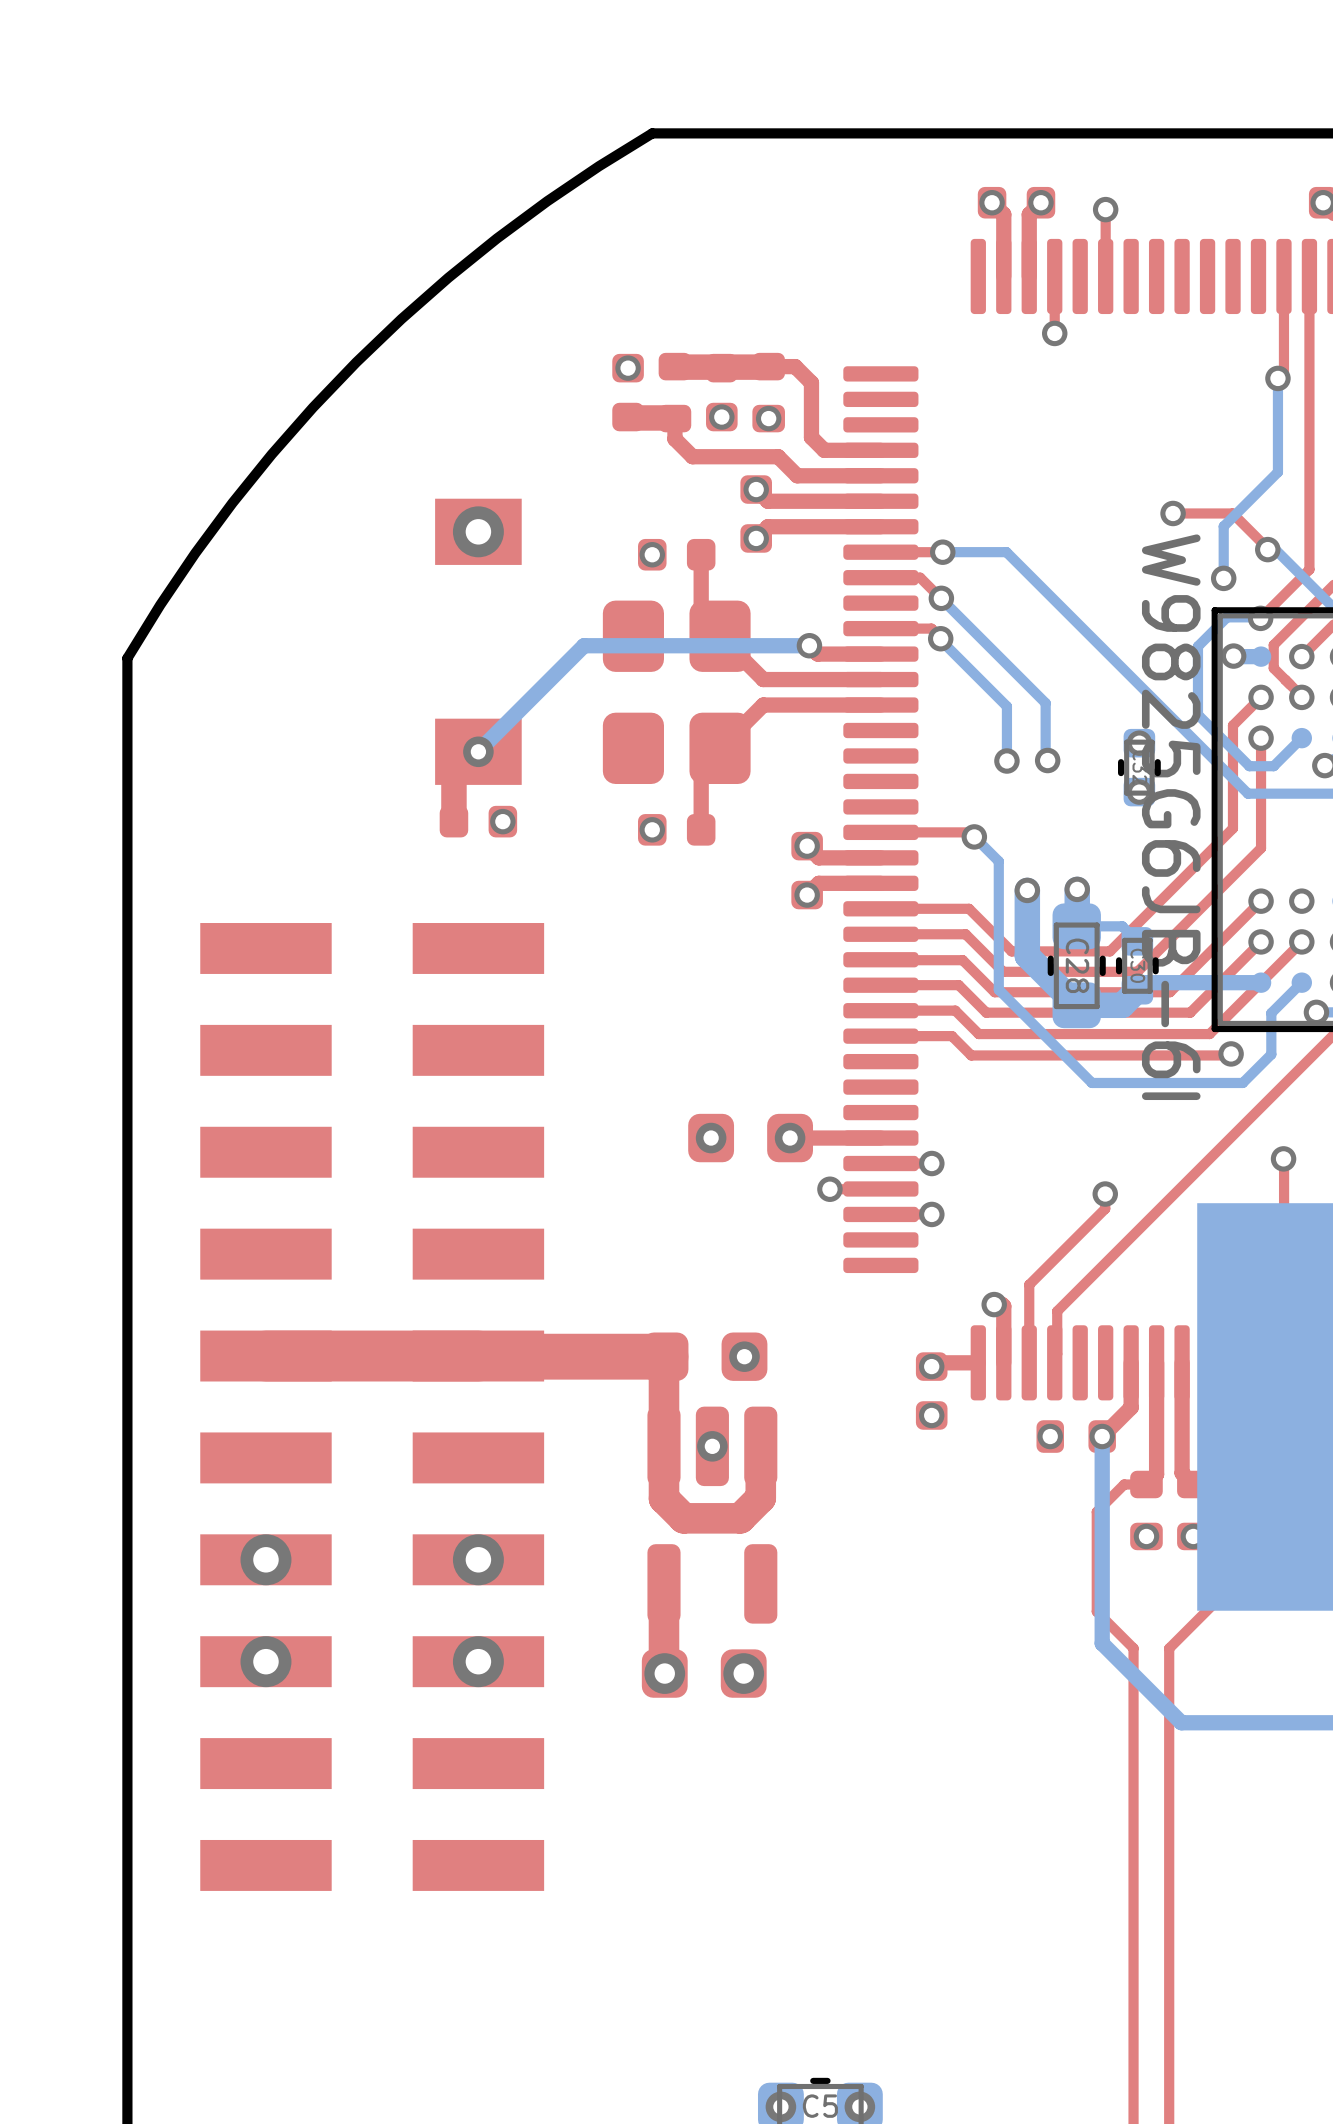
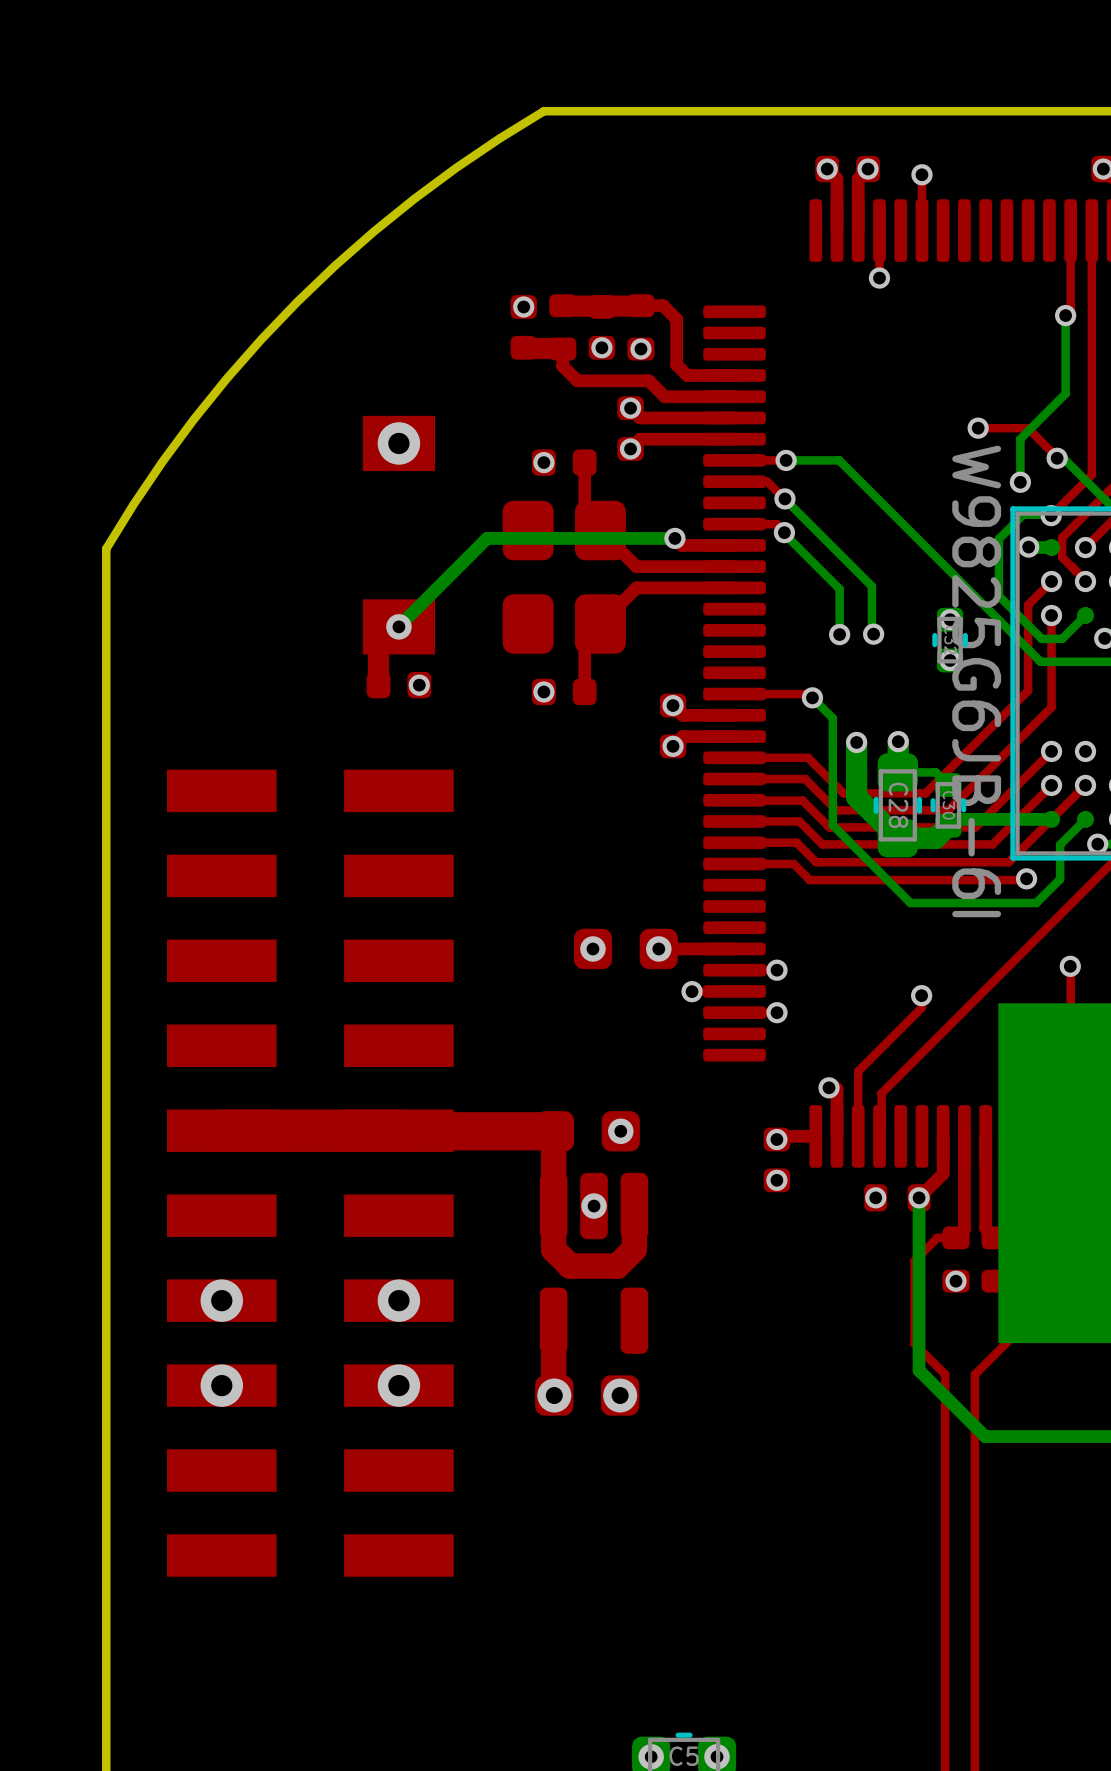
via: (1193, 1536) -> none

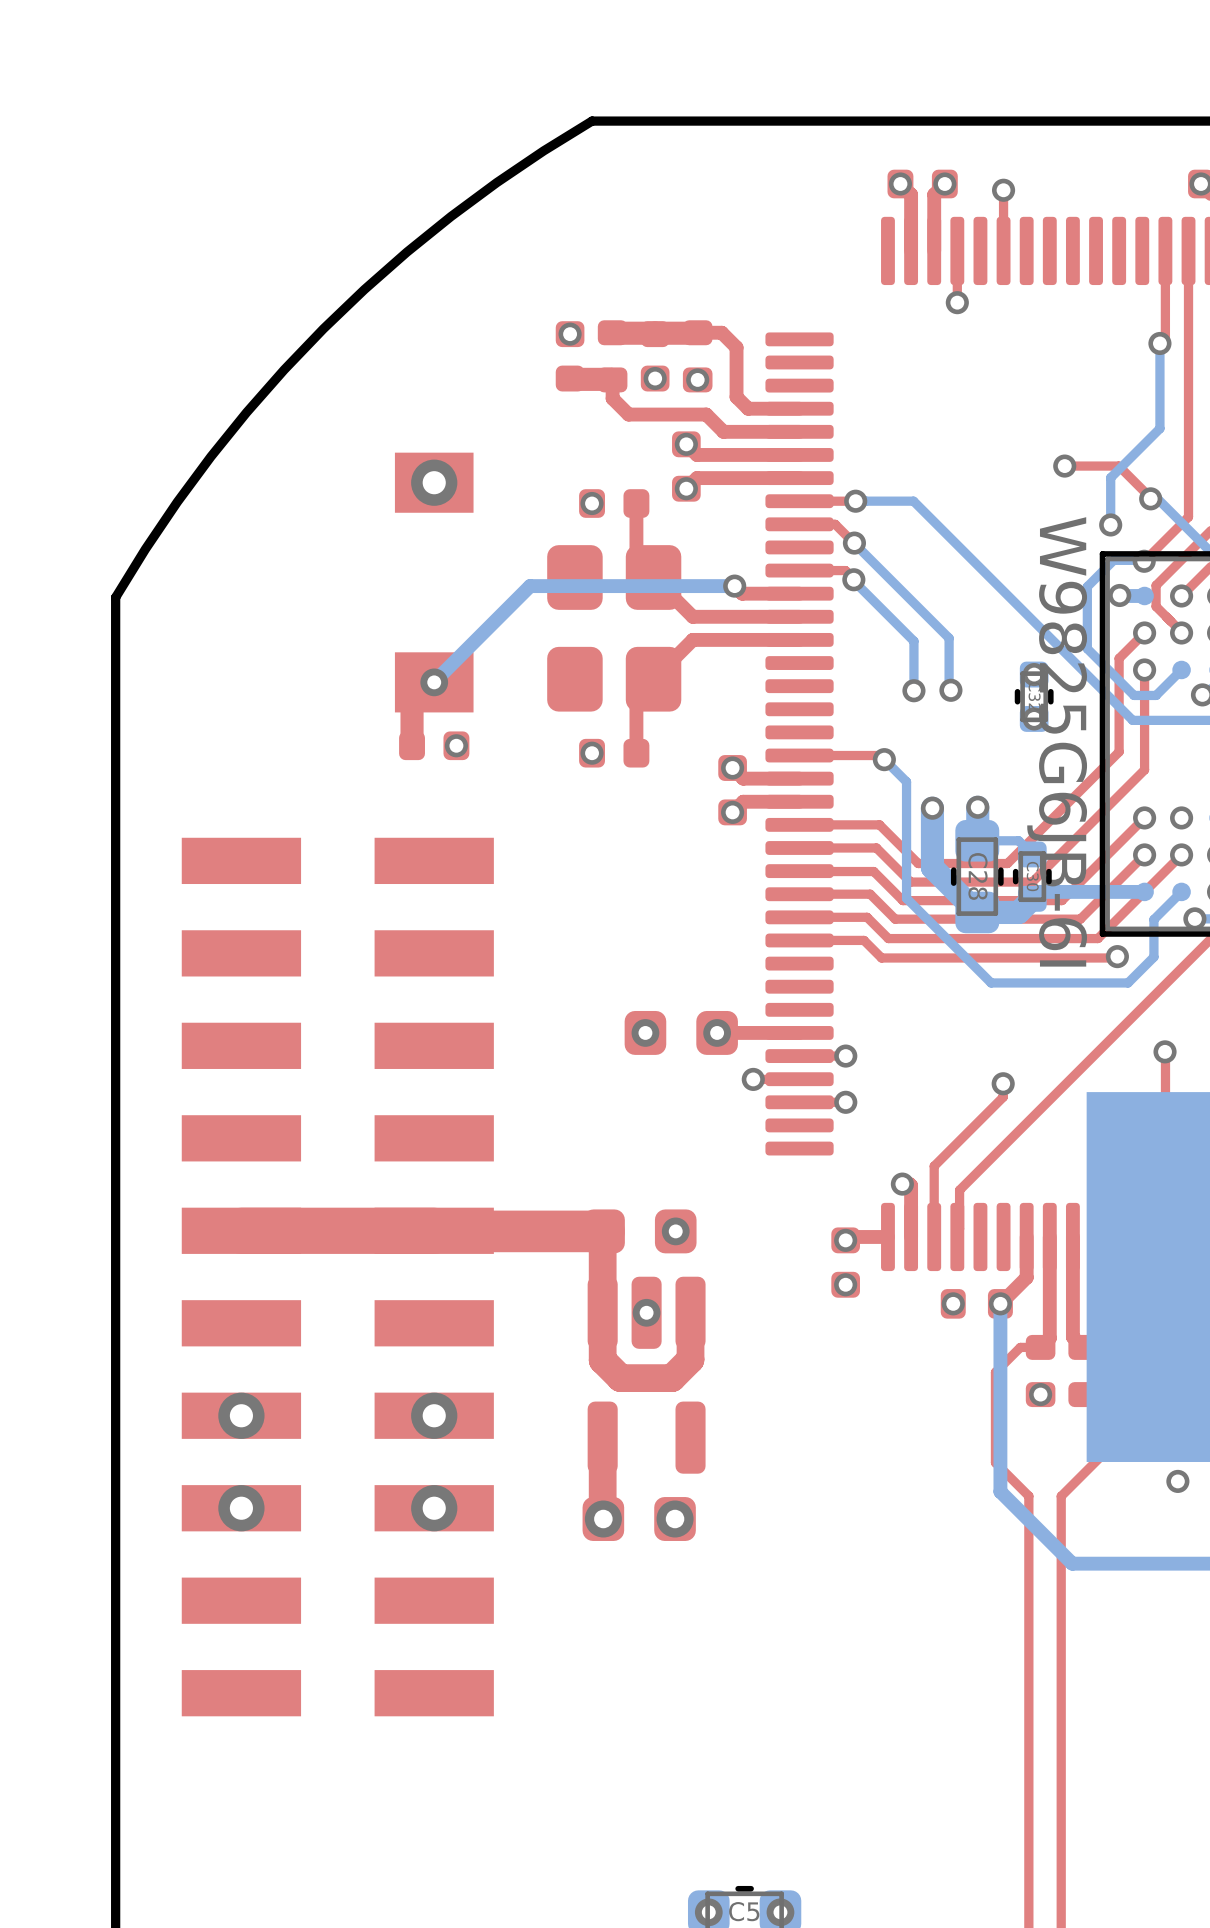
via: none -> (1177, 1481)

